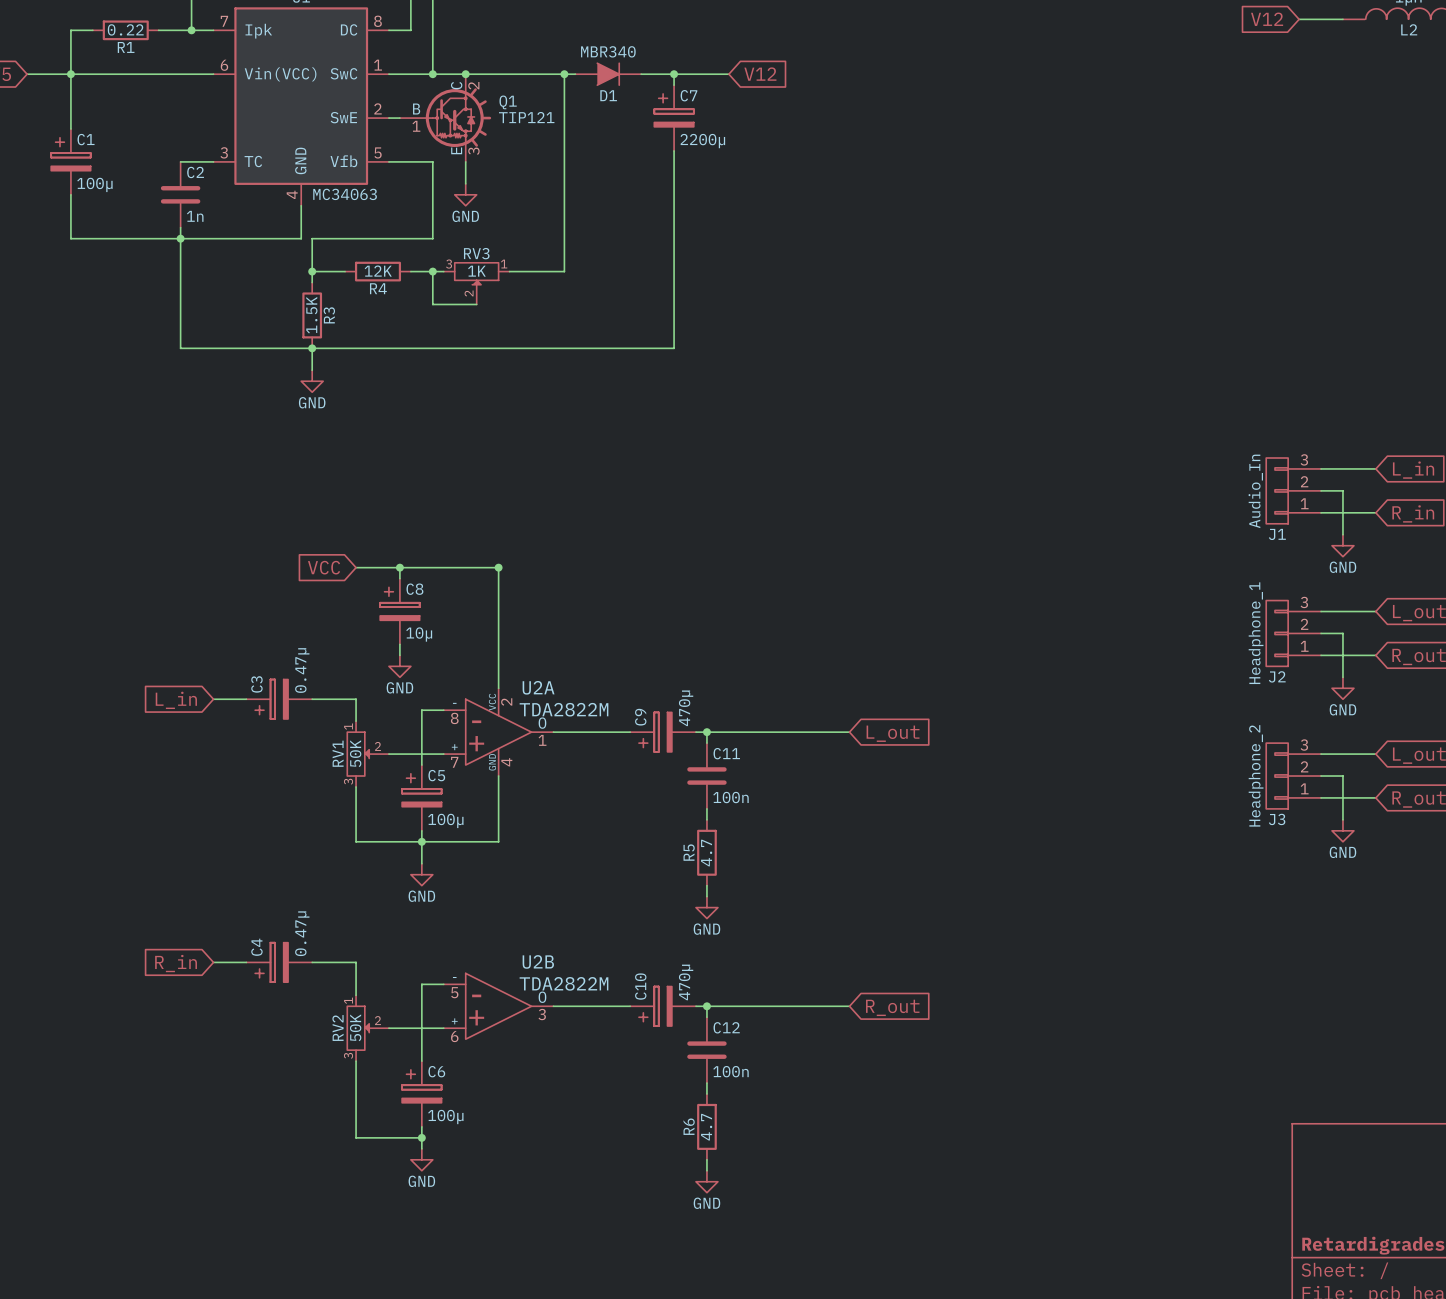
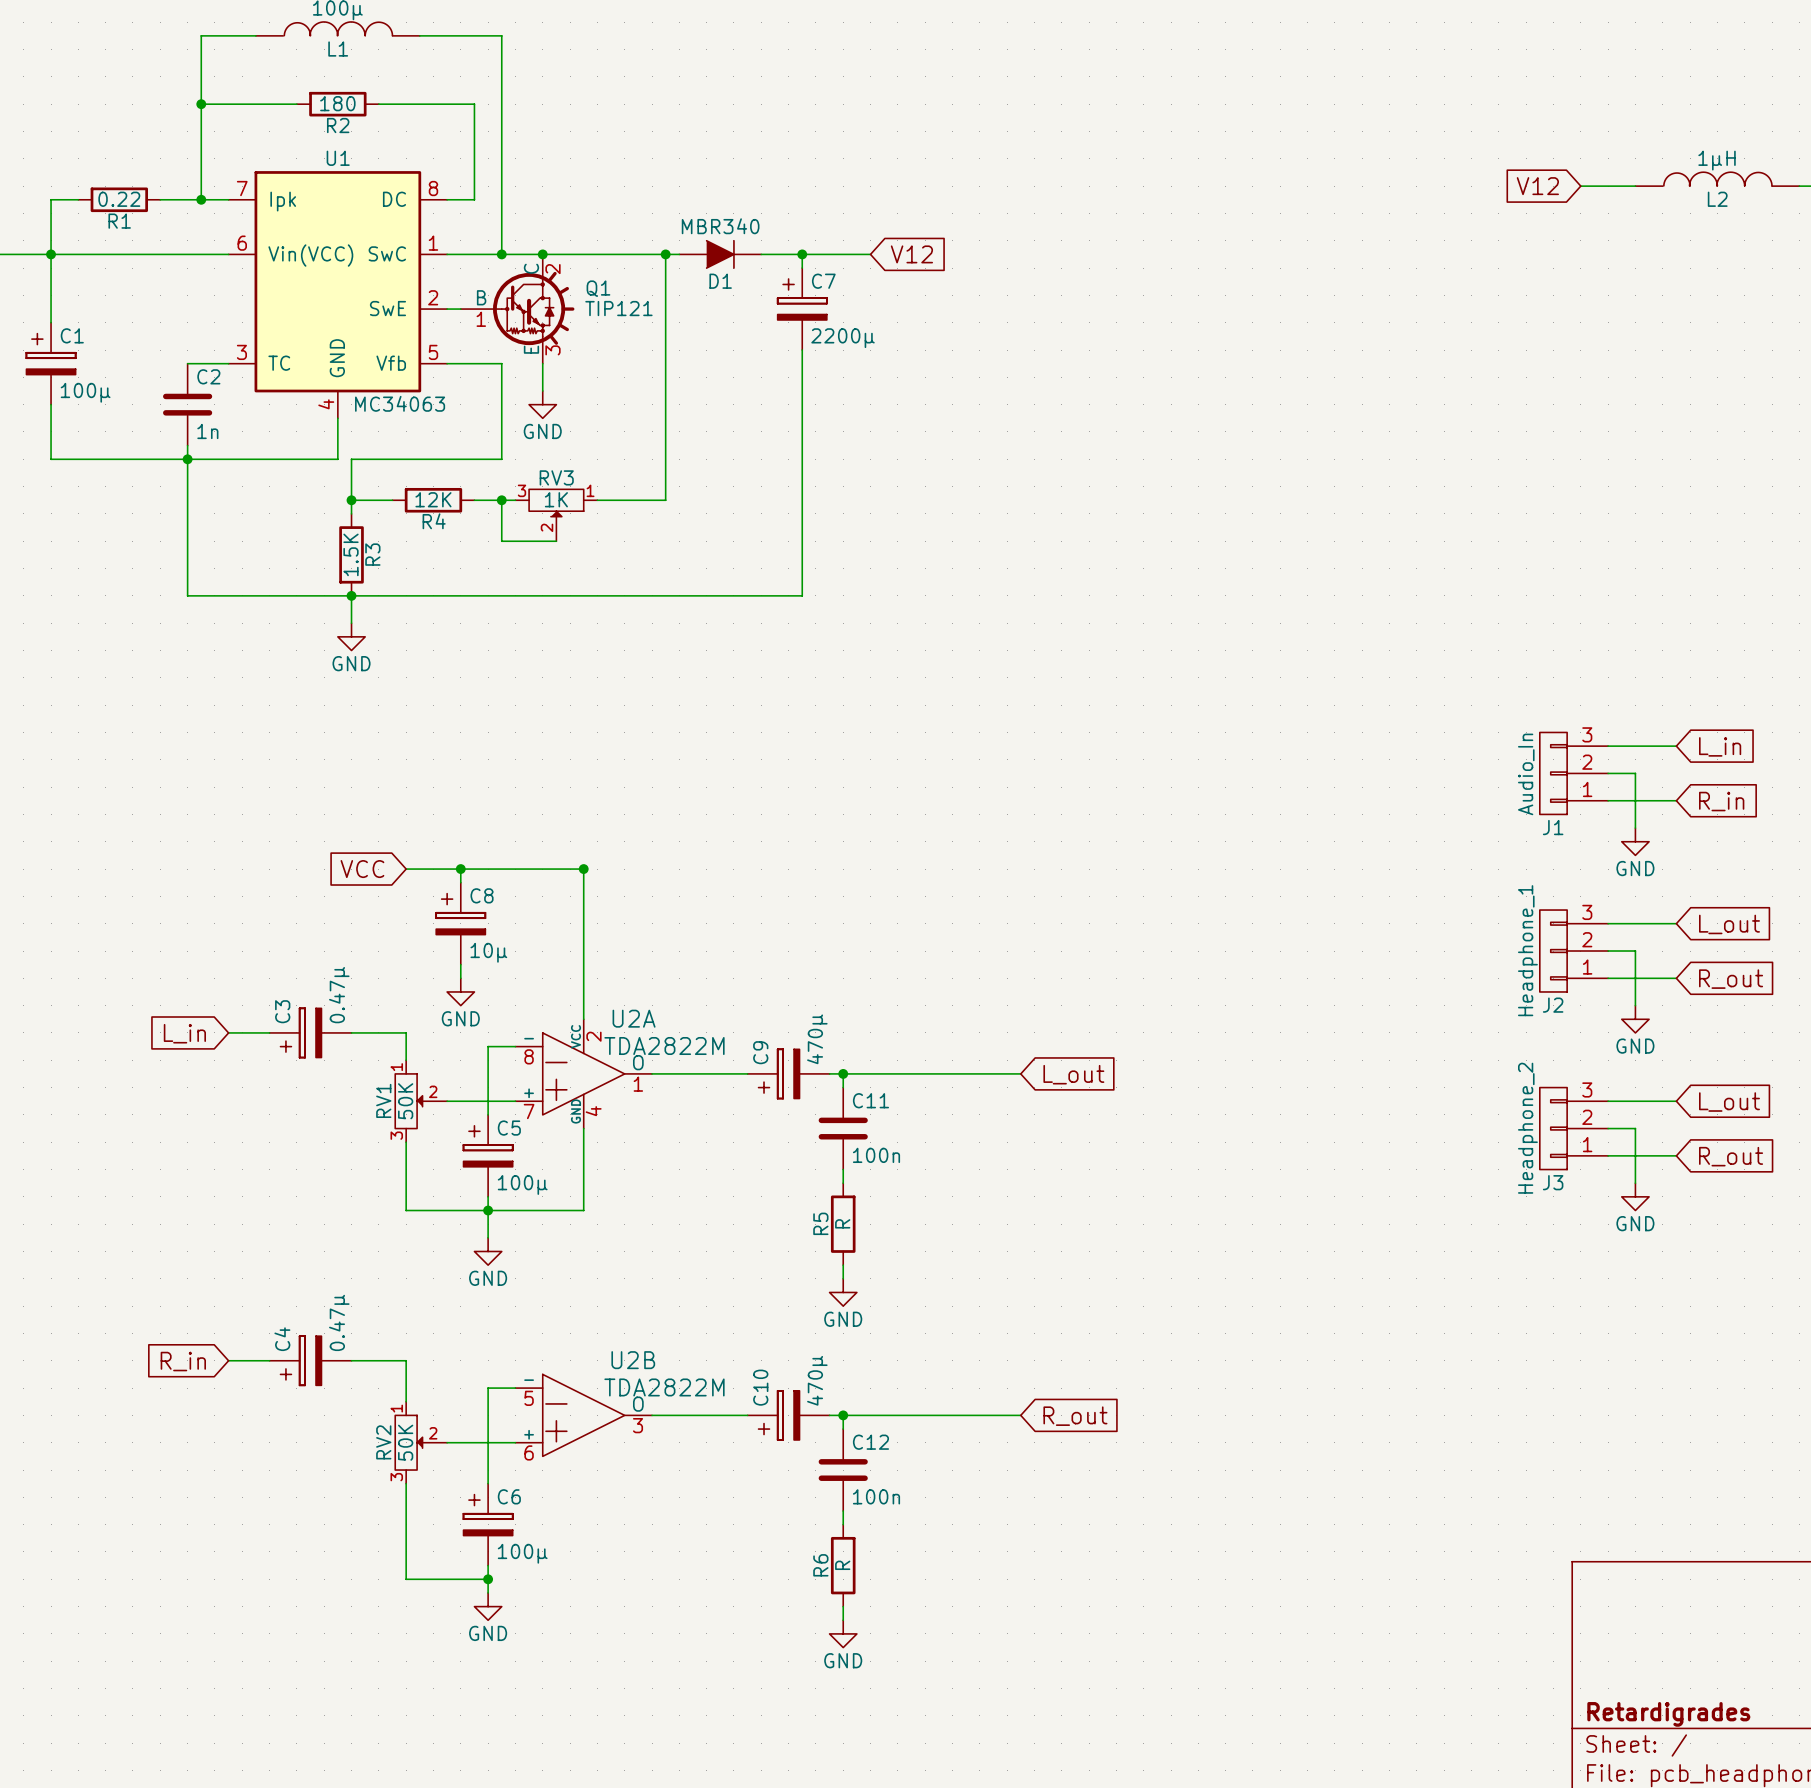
R5 value: 4.7 (706, 853) -> R (842, 1223)
R6 value: 4.7 (706, 1127) -> R (842, 1565)

